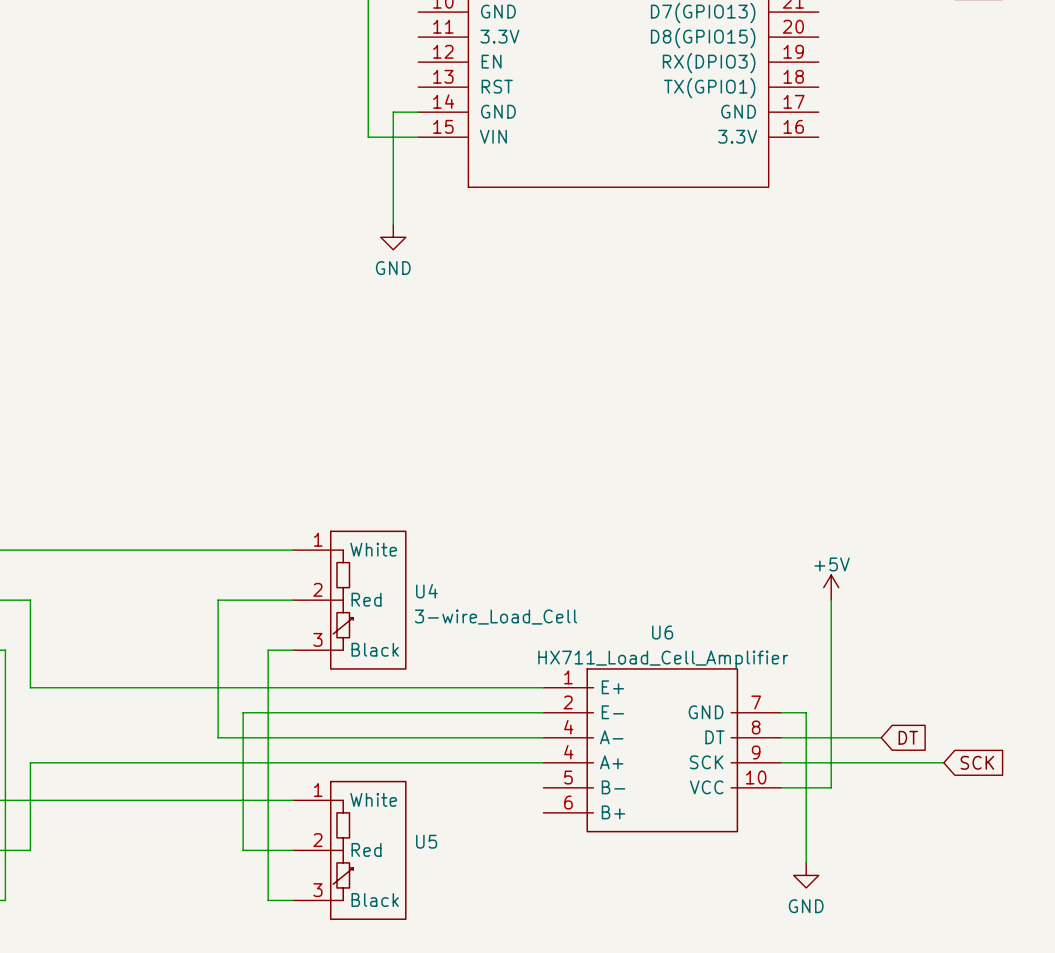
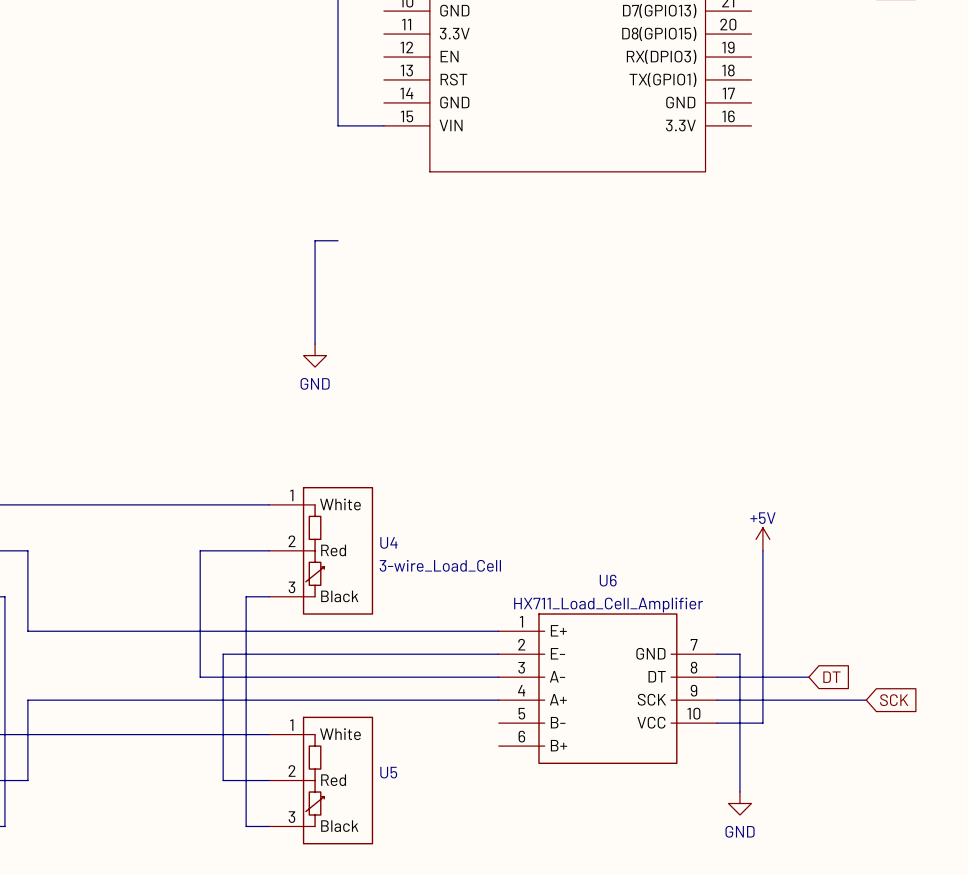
wire: (418, 112) (393, 112) (393, 224) -> (338, 240) (315, 240) (315, 344)
power symbol position: GND (393, 237) -> GND (315, 355)
U6 pin number: 4 (568, 727) -> 3 (521, 667)

